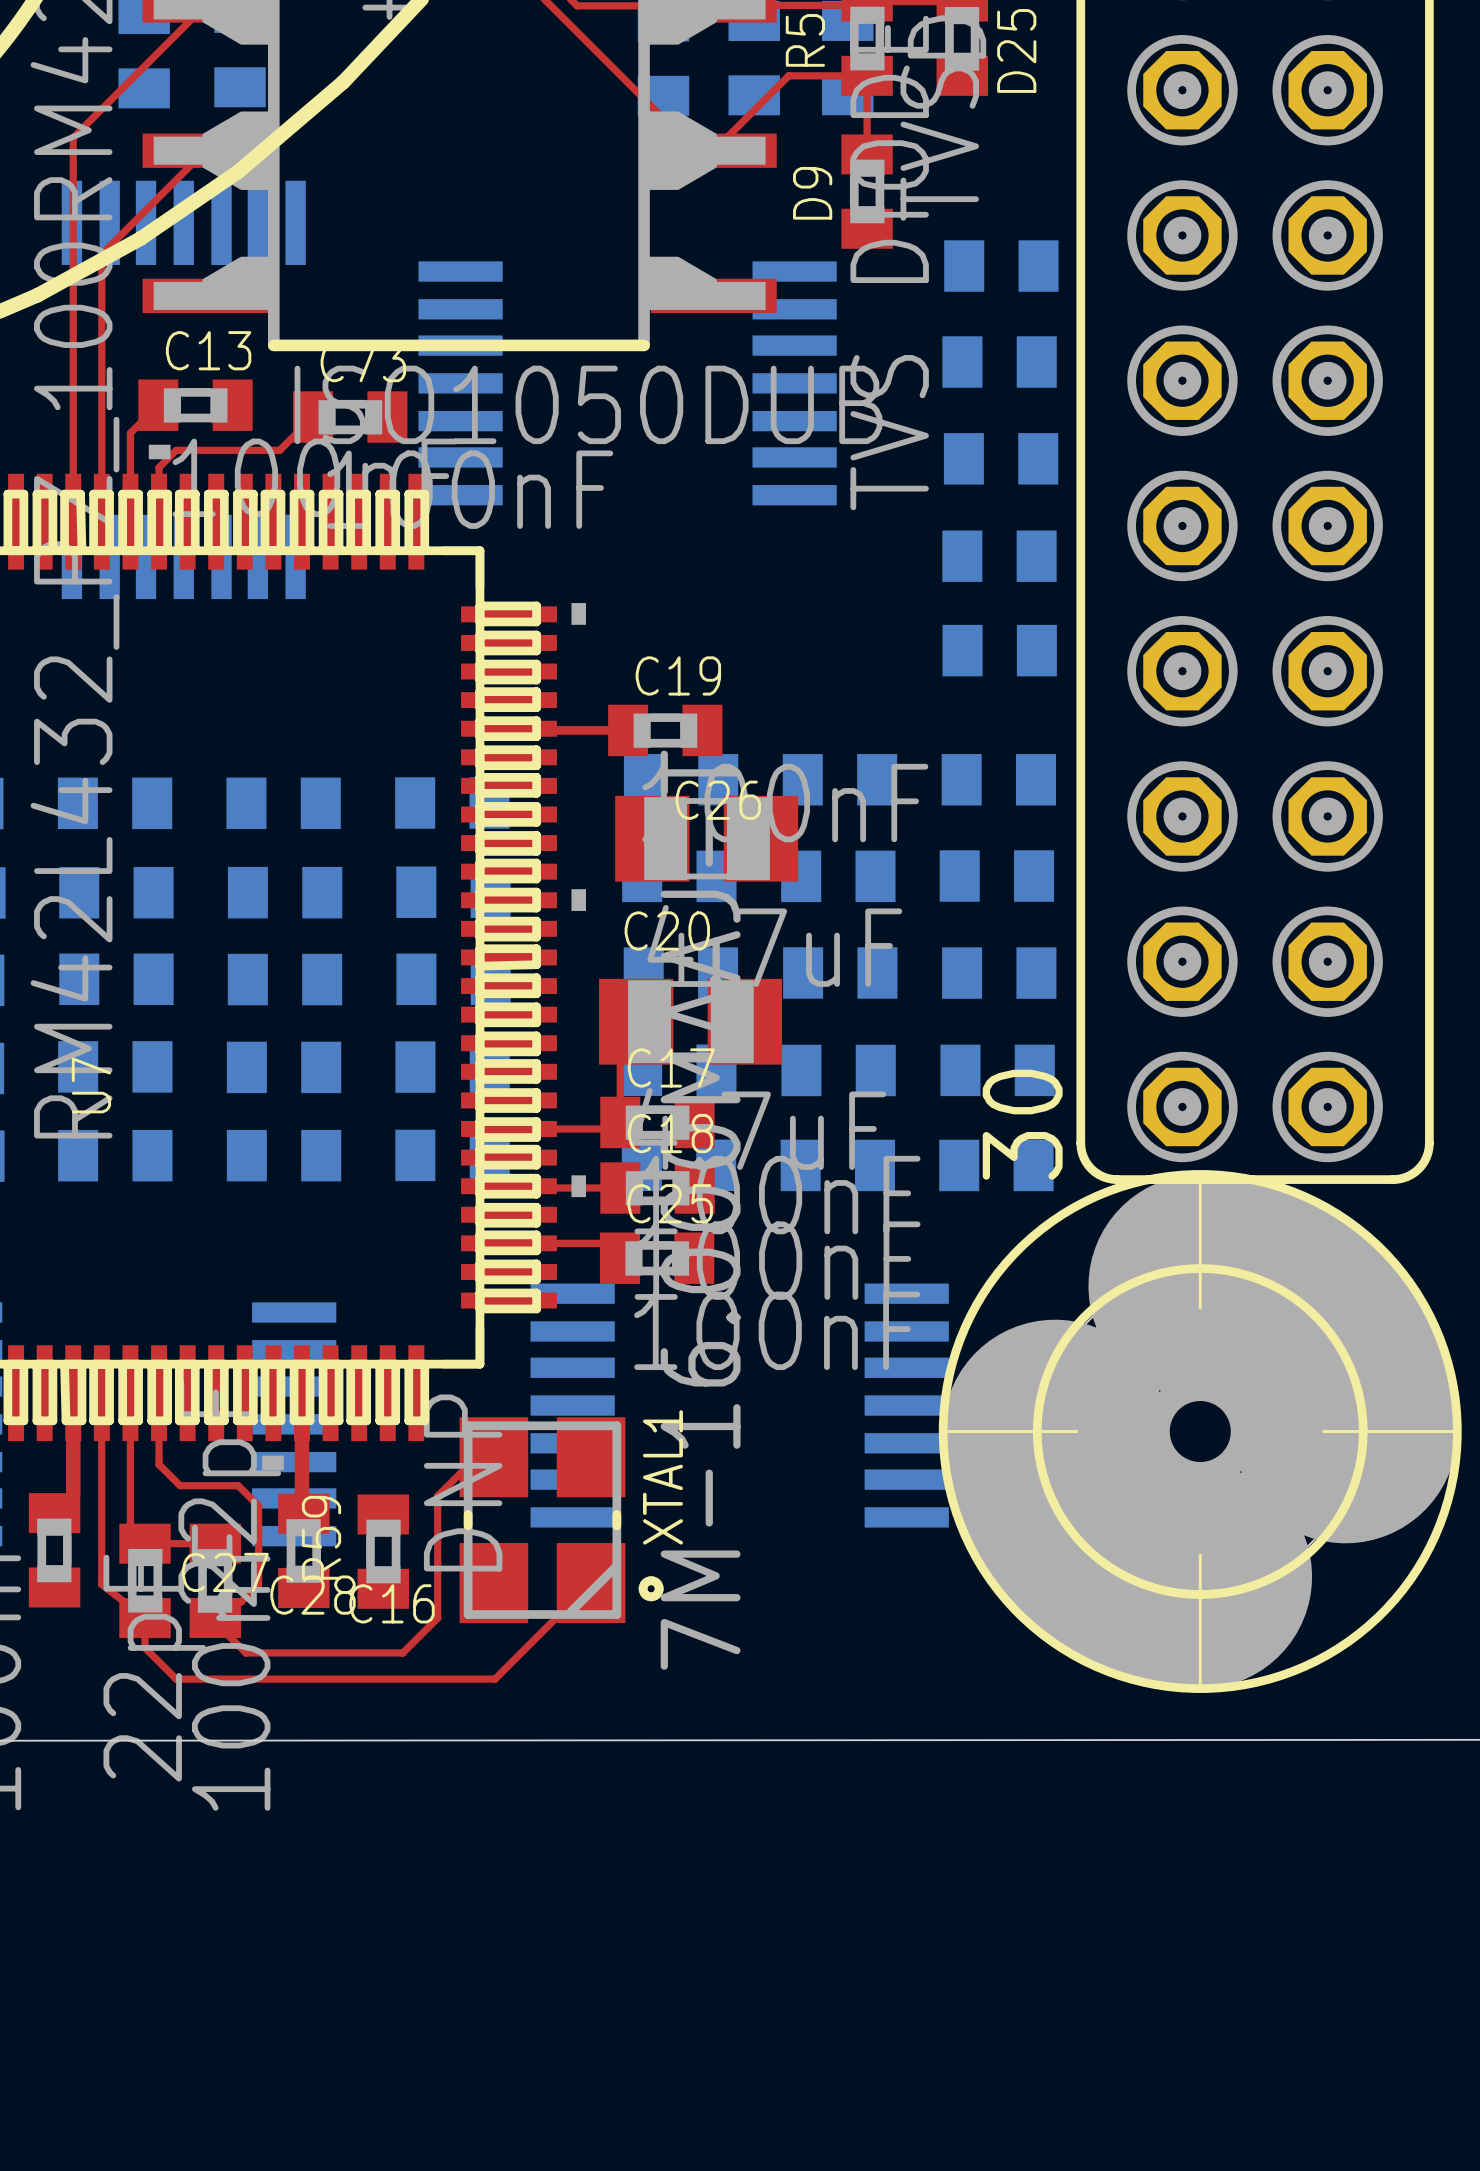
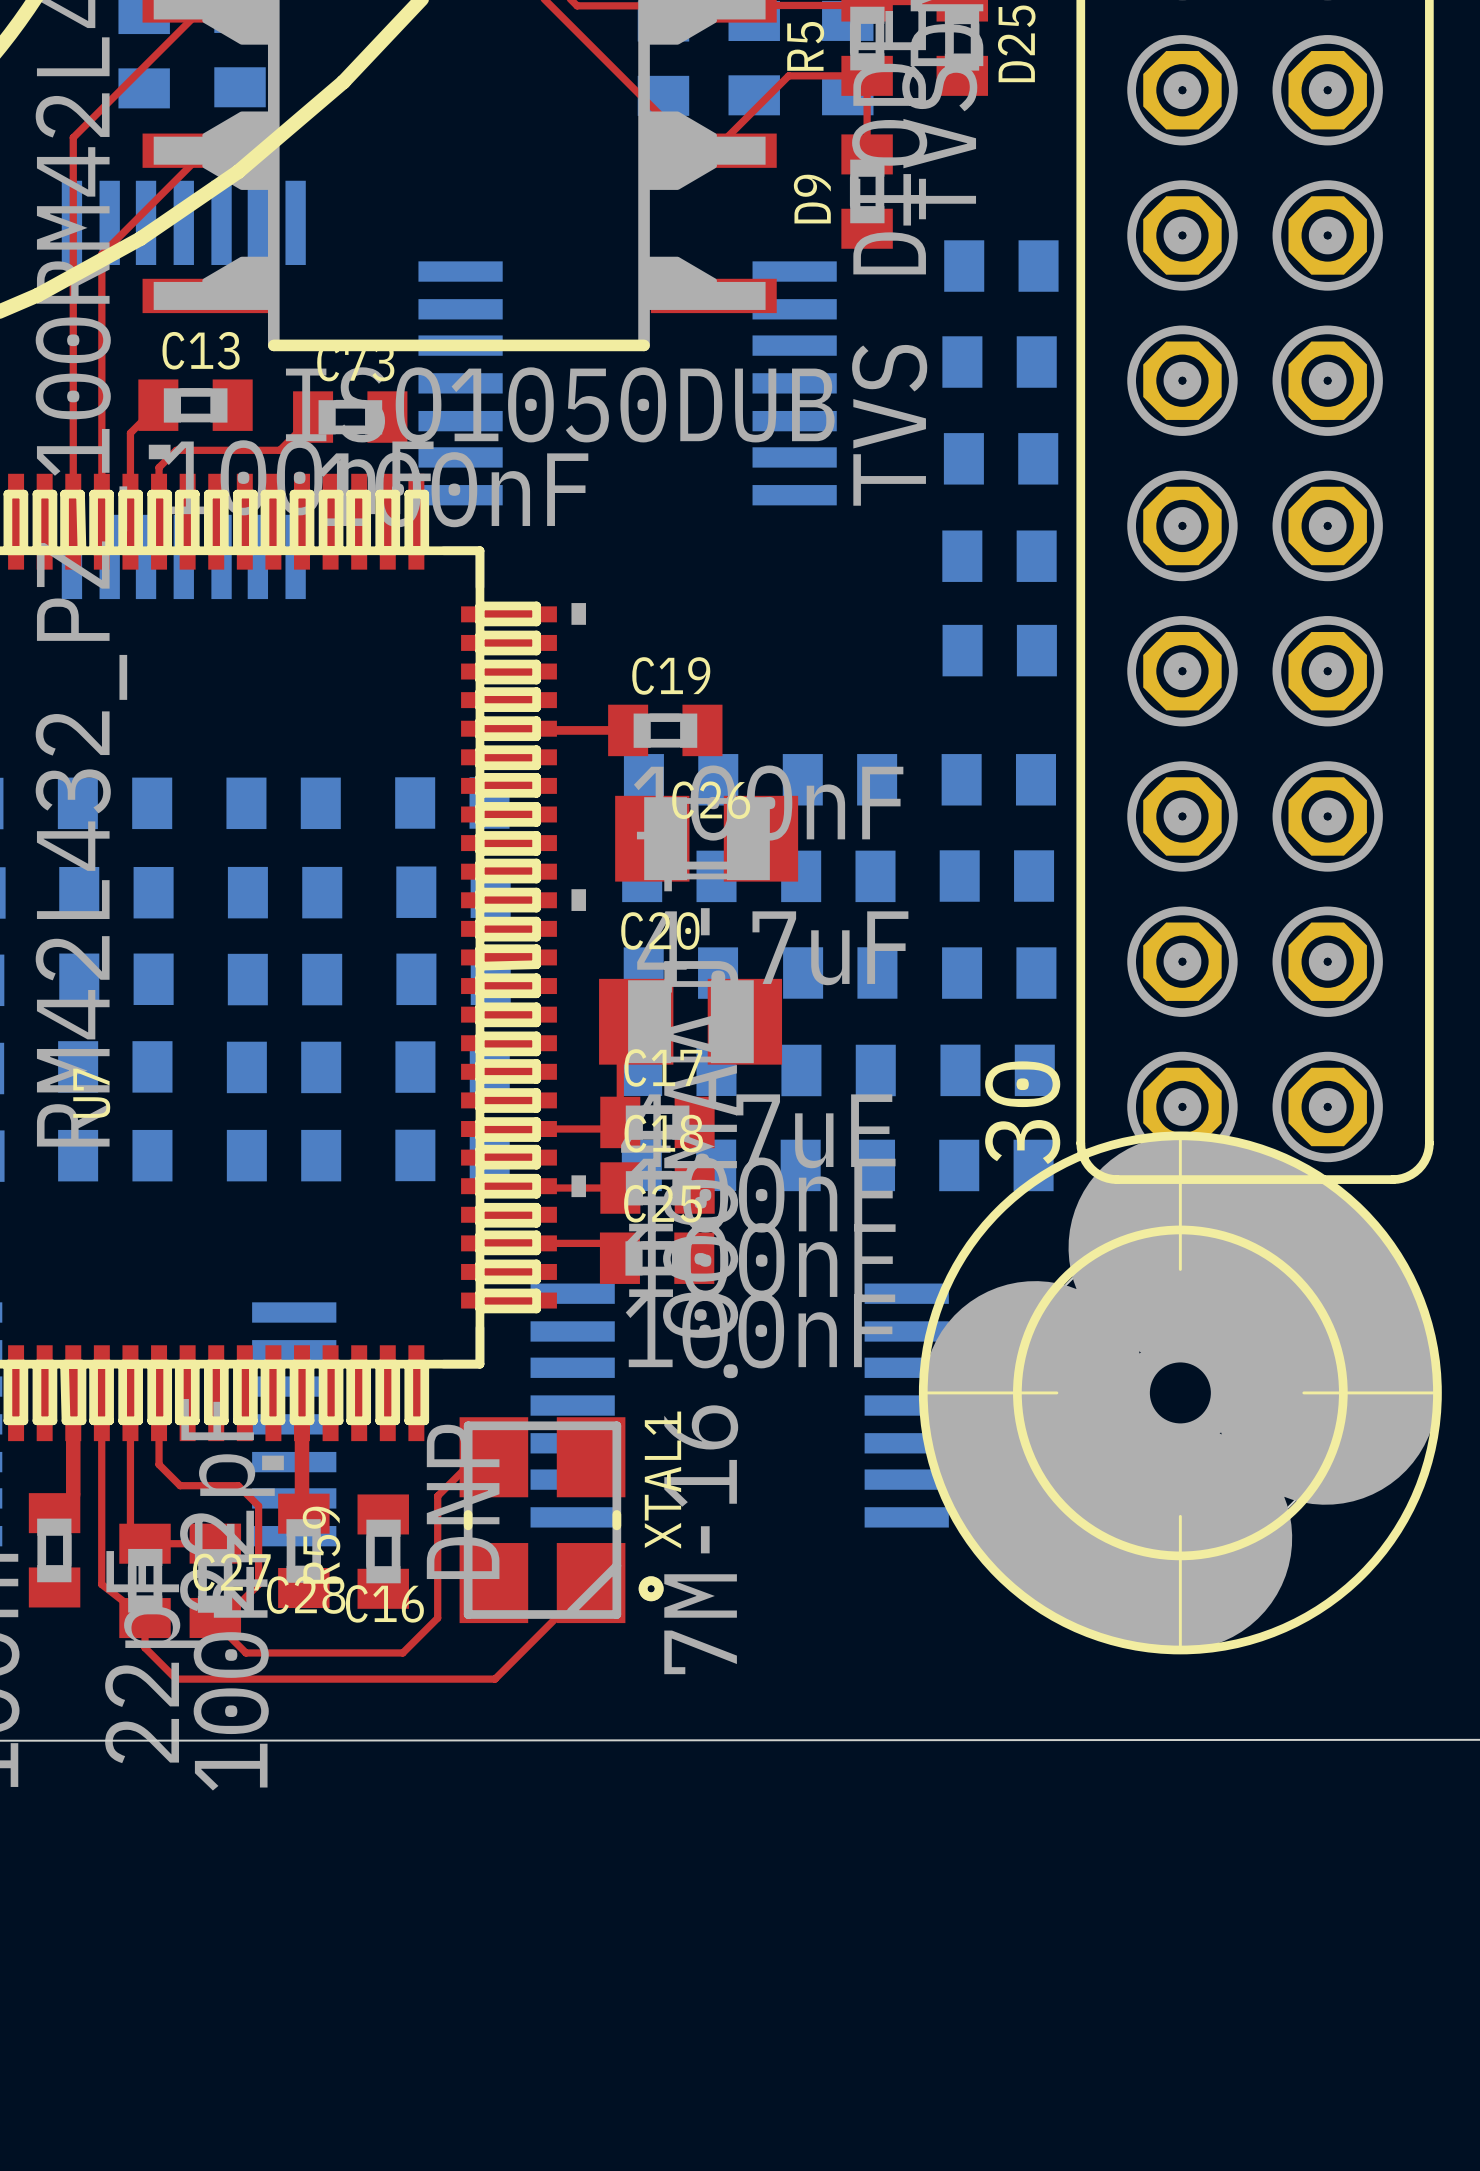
part position: (1200, 1431) -> (1180, 1392)

